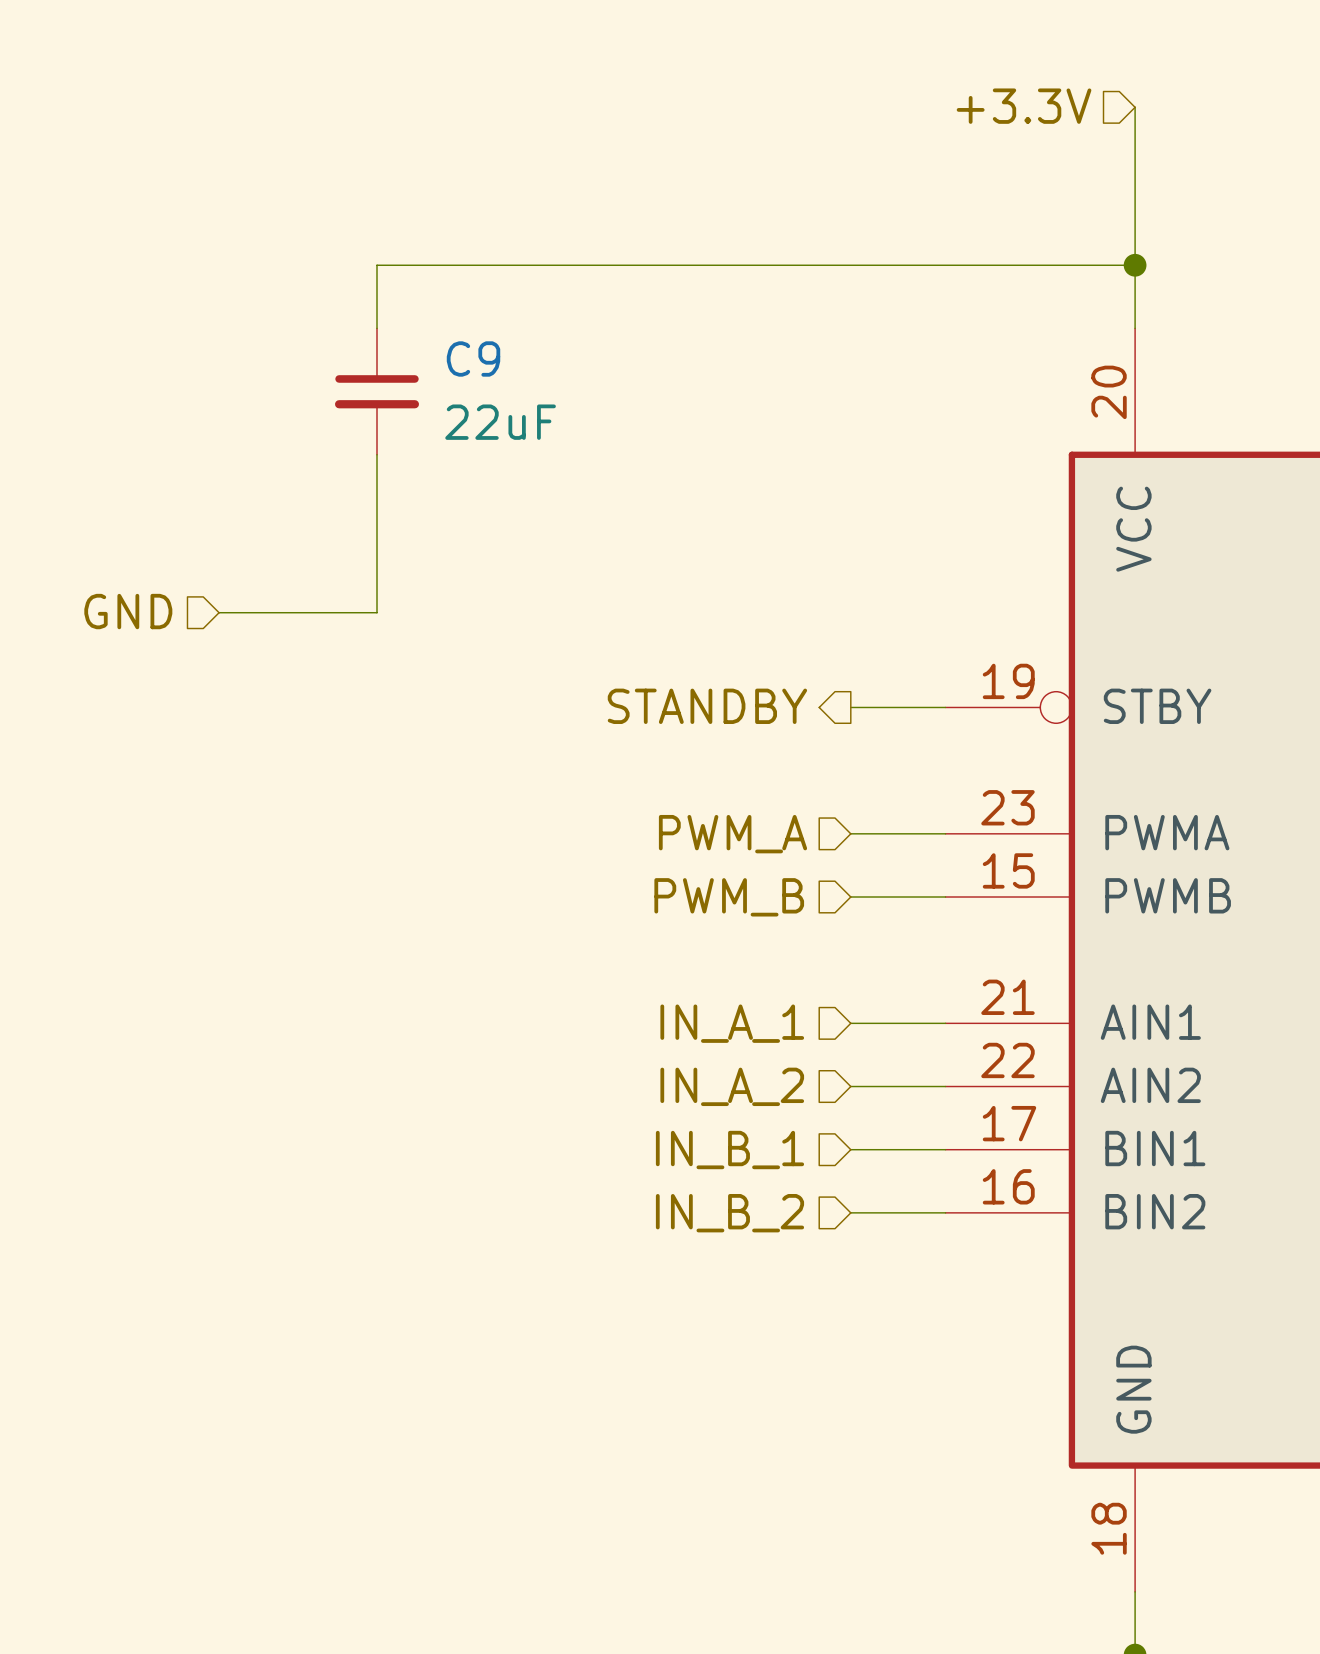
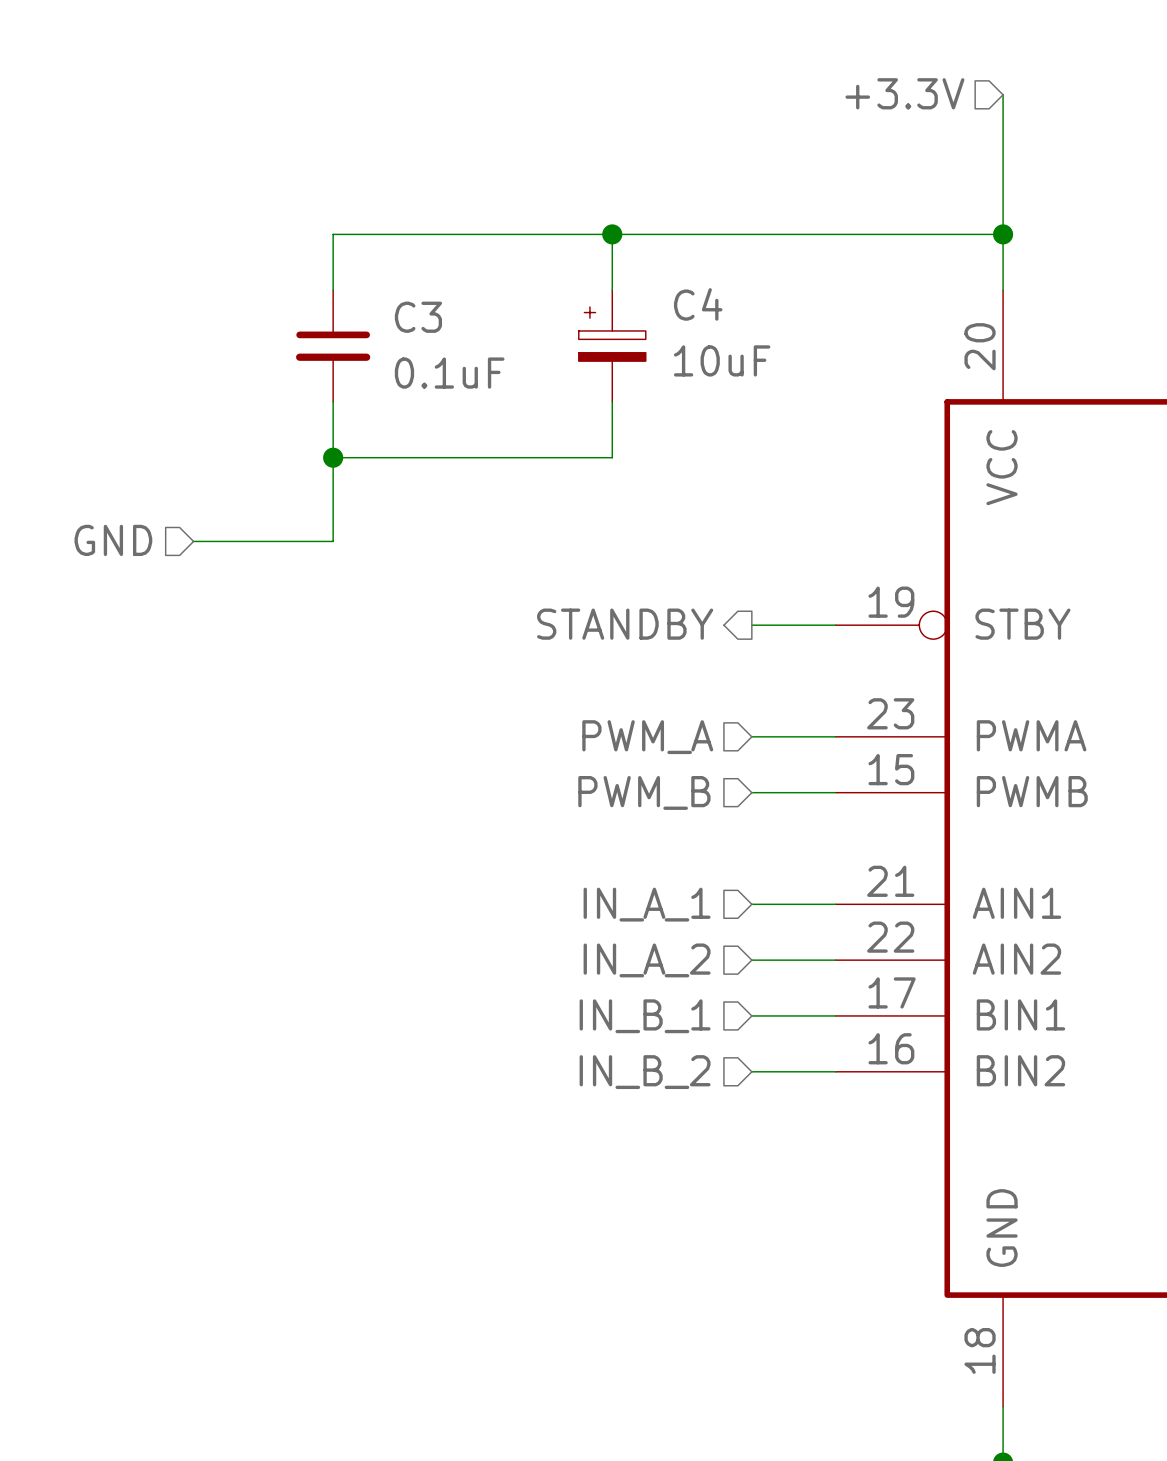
wire: none -> (612, 234) (612, 290)
junction: none -> (612, 234)
C9 name: C9 (473, 358) -> C3 (418, 317)
C4: none -> 10uF (612, 346)
C9 value: 22uF (500, 422) -> 0.1uF (449, 373)
wire: none -> (612, 401) (612, 457) (333, 457)
junction: none -> (333, 457)

